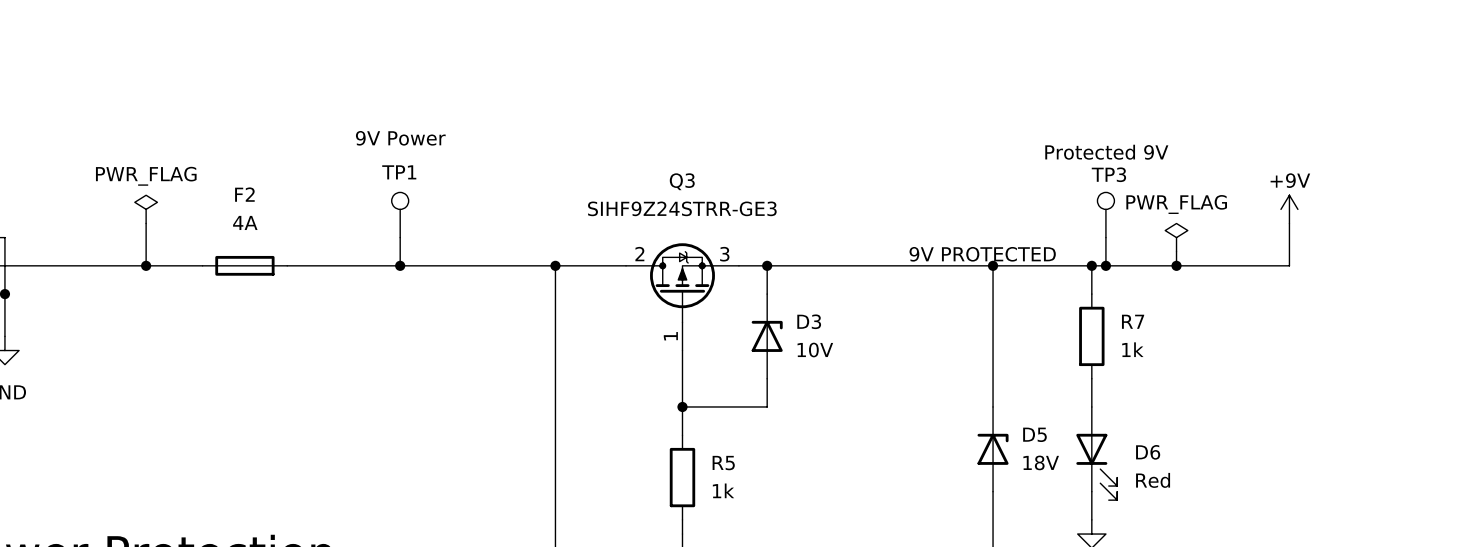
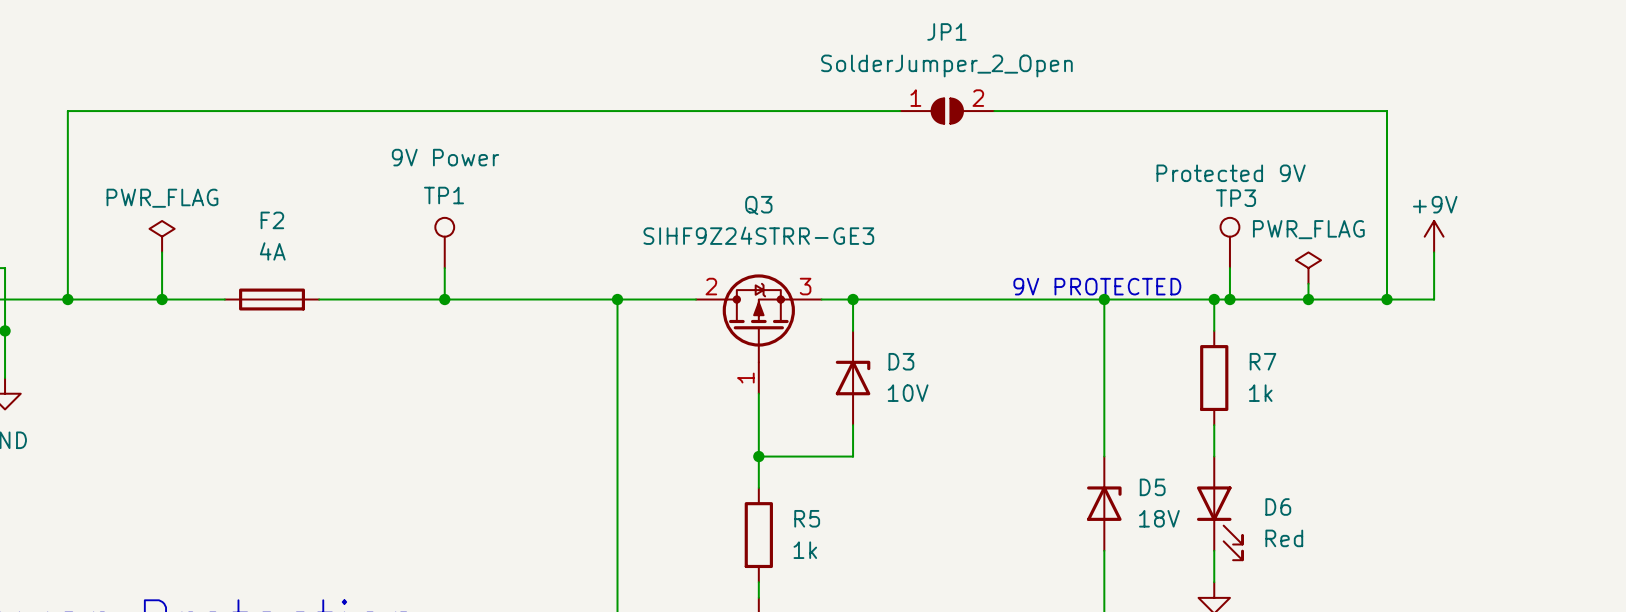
wire: none -> (900, 111) (67, 111) (67, 299)
JP1: none -> SolderJumper_2_Open (947, 111)
wire: none -> (994, 111) (1387, 111) (1387, 299)
junction: none -> (67, 299)
junction: none -> (1387, 299)

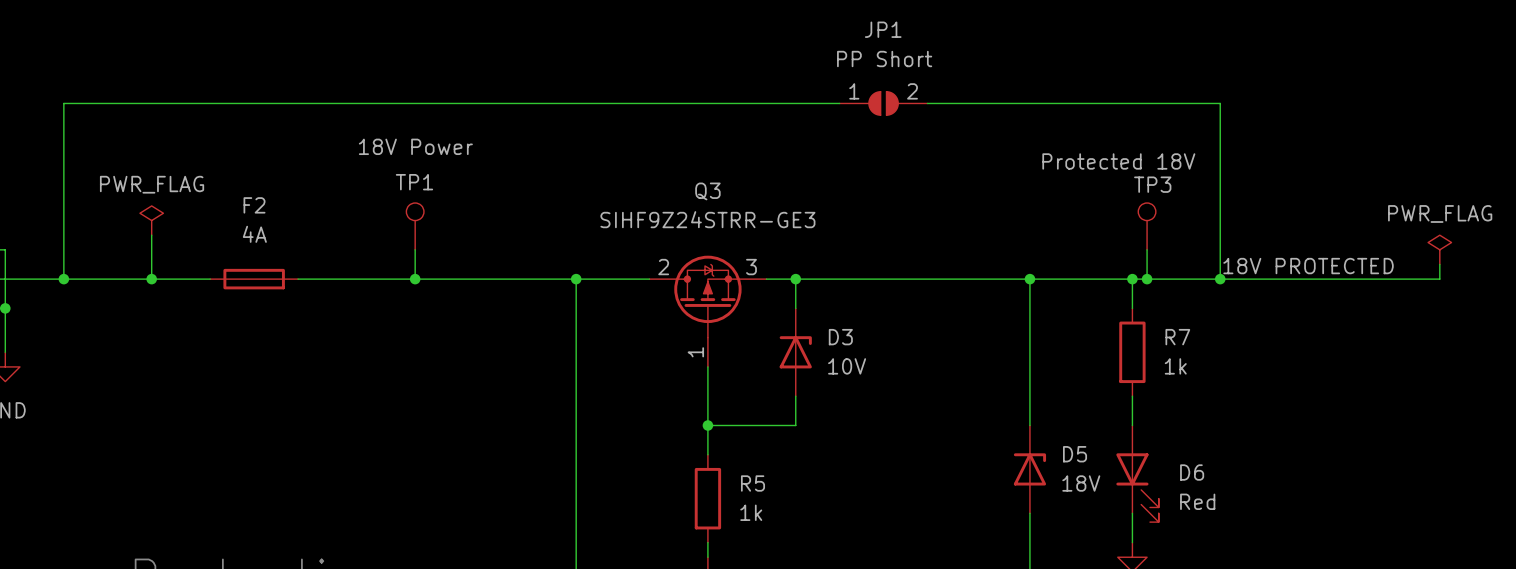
JP1 value: SolderJumper_2_Open (946, 65) -> PP Short (884, 59)
wire: (1308, 111) (1387, 111) (1387, 299) -> (1220, 103) (1220, 264)
TP1 text: 9V Power (445, 157) -> 18V Power (415, 146)
TP3 text: Protected 9V (1231, 173) -> Protected 18V (1118, 161)
power symbol: +9V (1434, 236) -> none
wire: (1434, 252) (1434, 299) -> (1439, 264) (1439, 279) (1337, 279)
power symbol position: PWR_FLAG (1308, 268) -> PWR_FLAG (1439, 249)
label: none -> 18V PROTECTED (1308, 266)
text: 9V PROTECTED (1097, 286) -> none
junction: (1387, 299) -> none

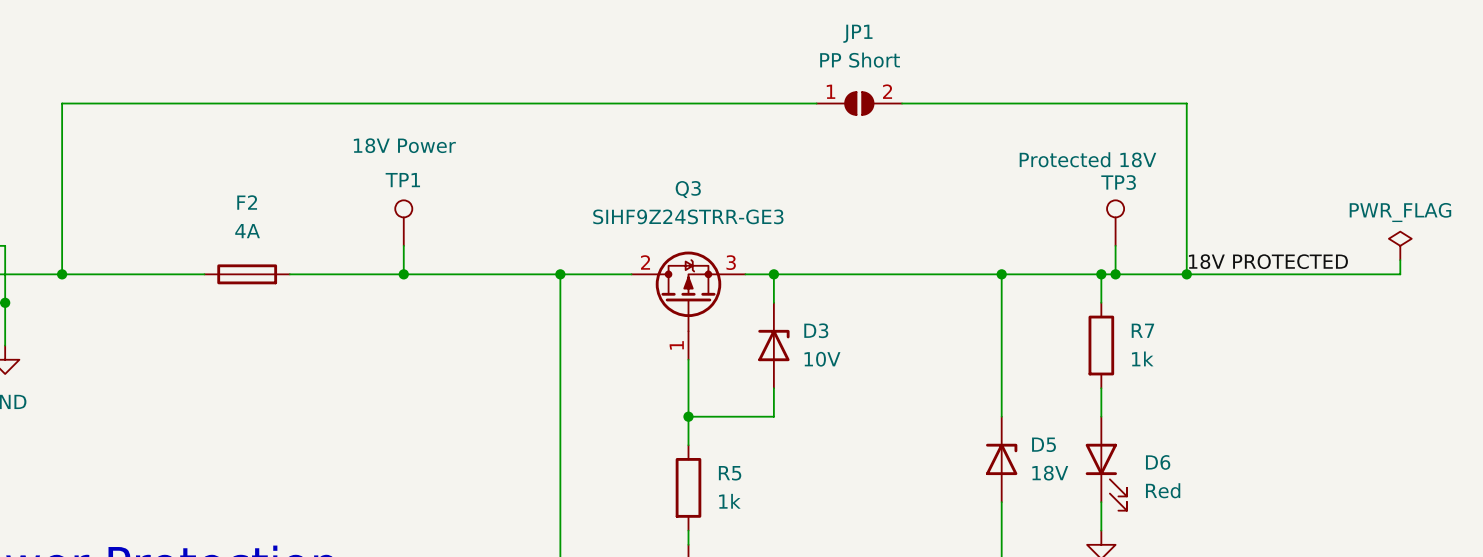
power symbol: PWR_FLAG (151, 220) -> none
wire: (151, 235) (151, 279) -> none
junction: (151, 279) -> none

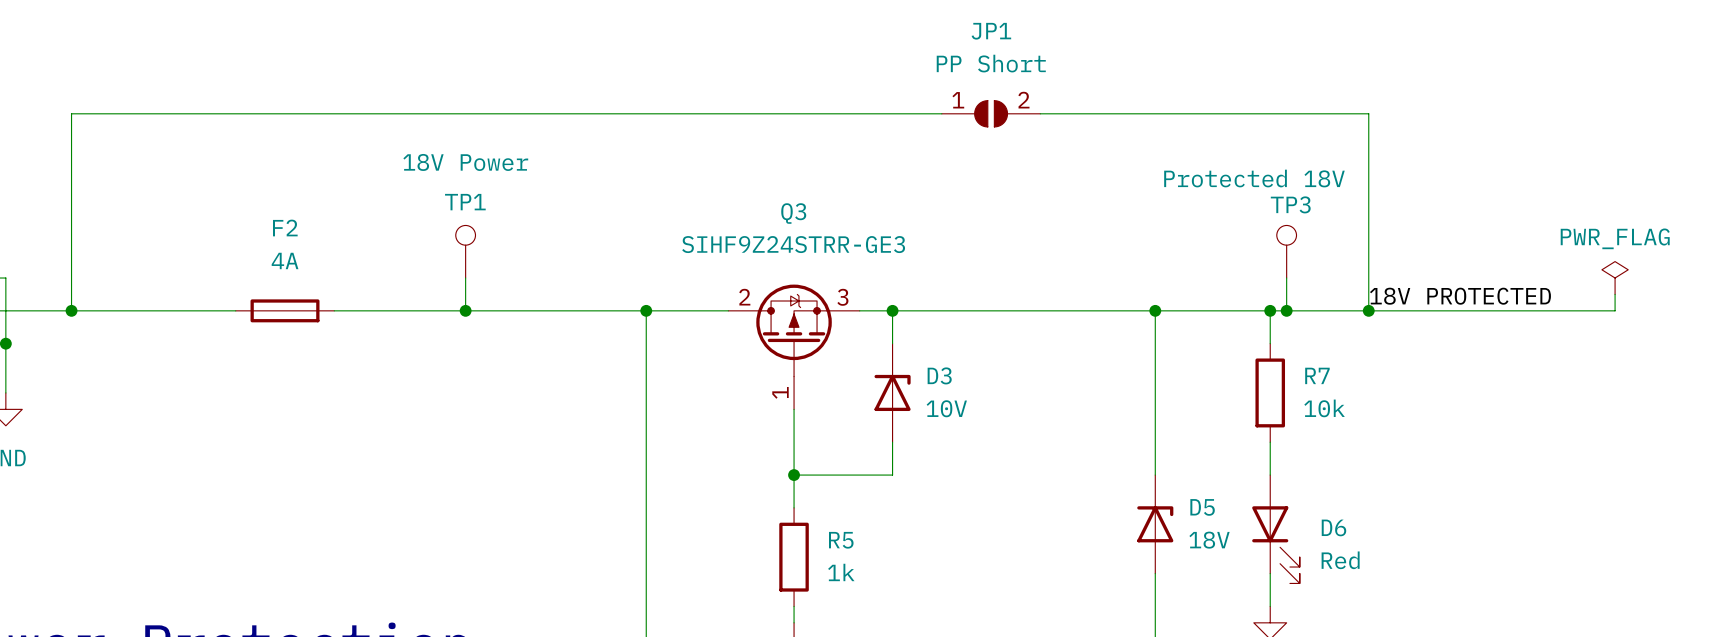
R7 value: 1k (1142, 358) -> 10k (1324, 408)

